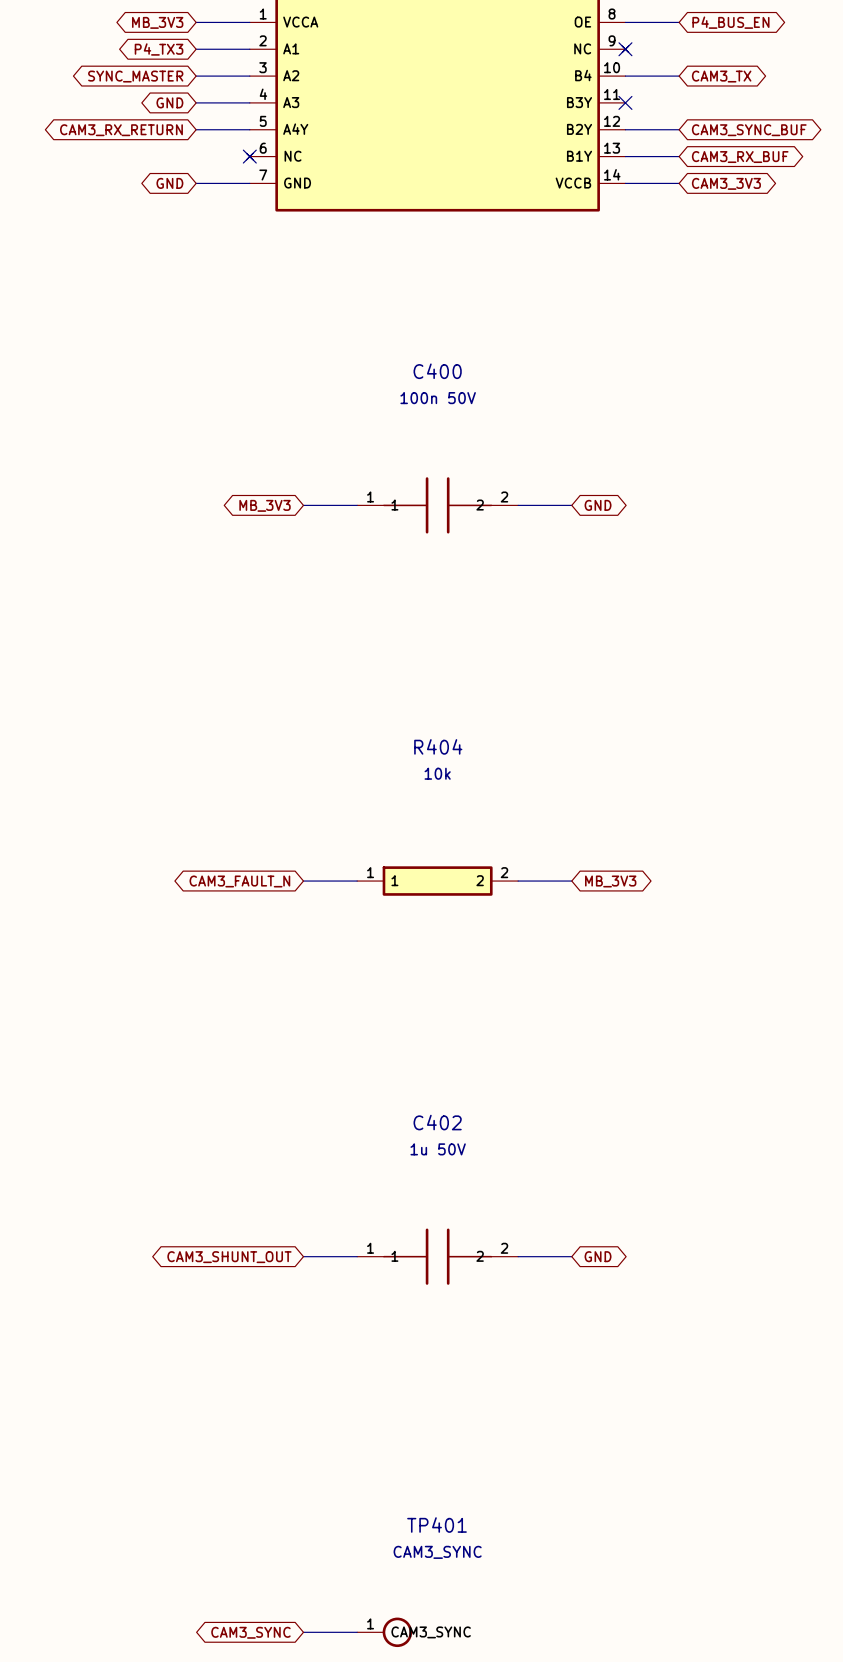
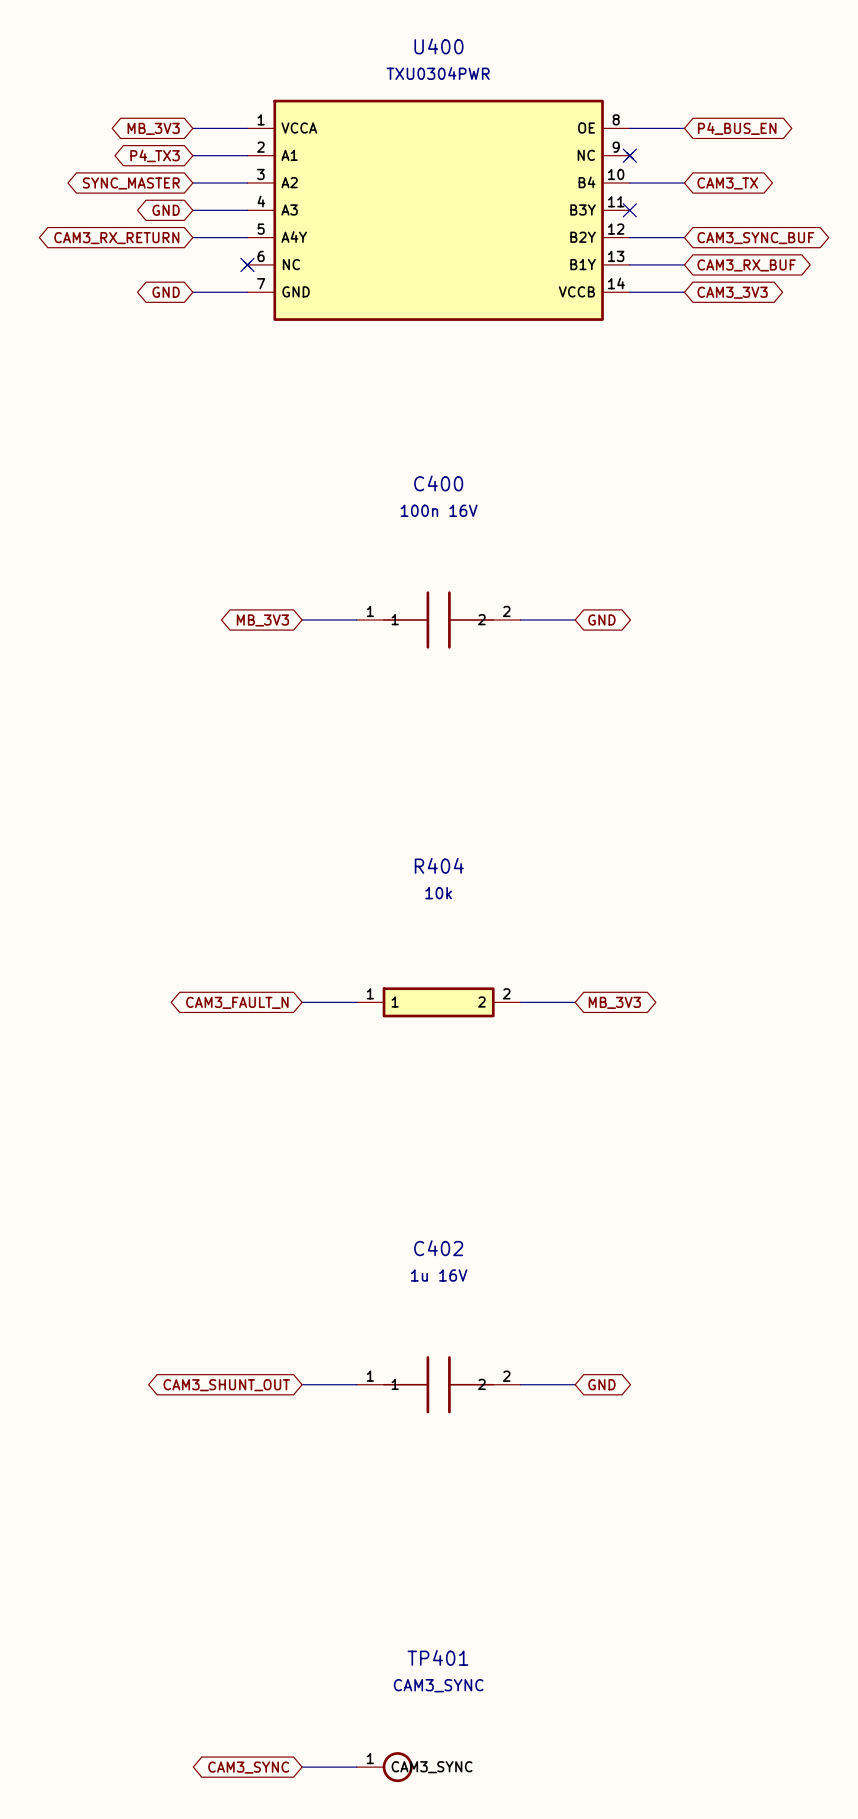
C400 value: 100n 50V (438, 398) -> 100n 16V (439, 510)
C402 value: 1u 50V (438, 1149) -> 1u 16V (439, 1275)

